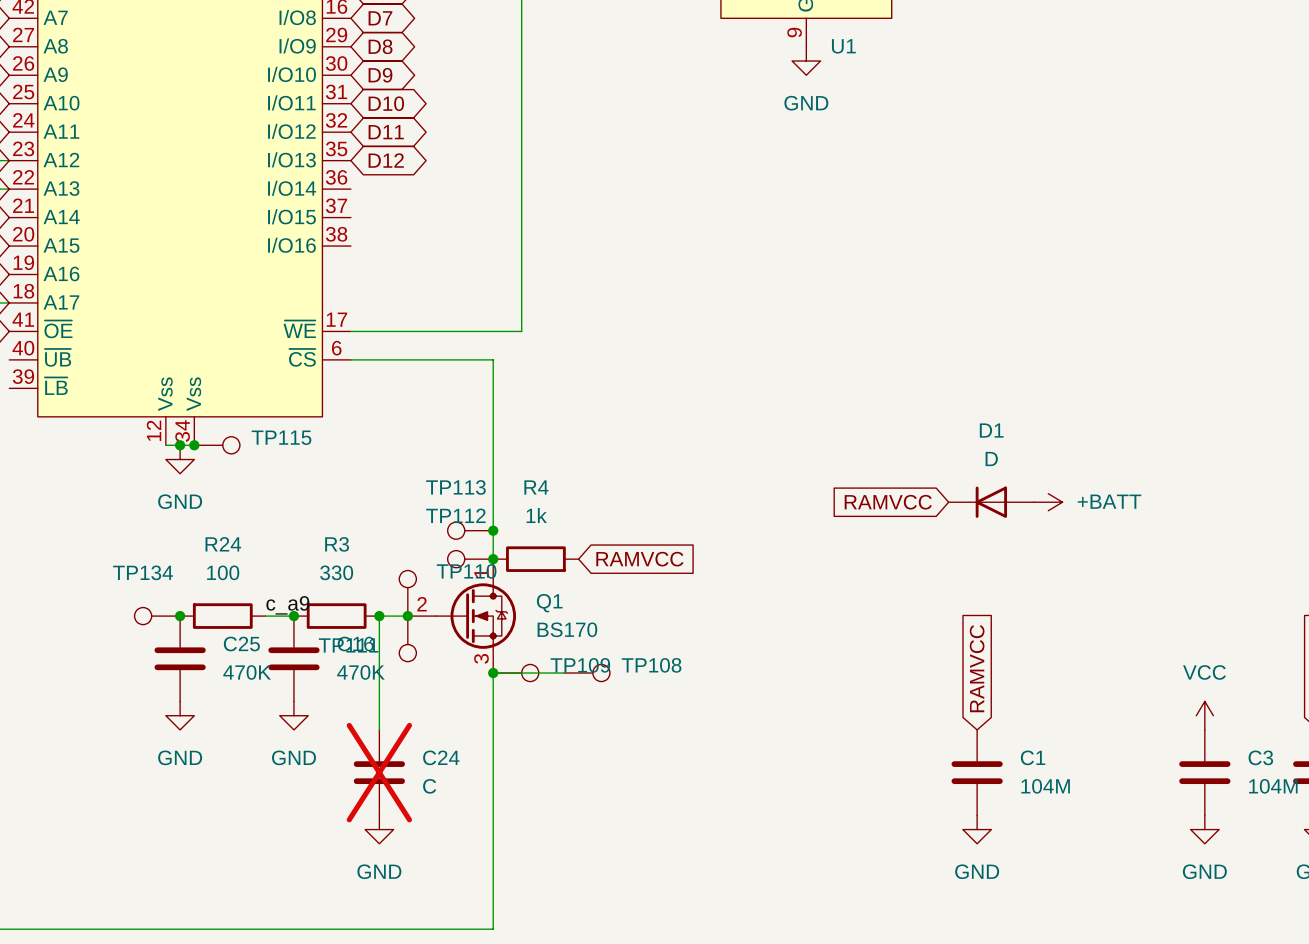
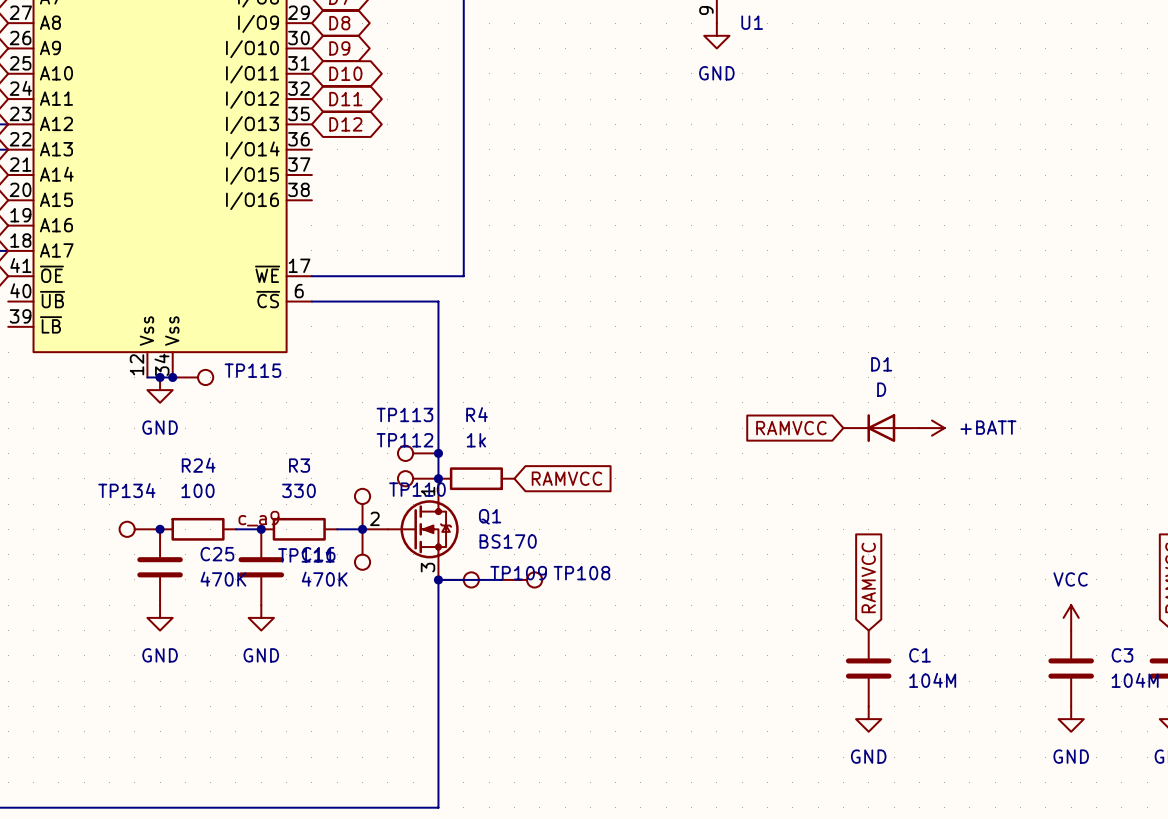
wire: (379, 616) (379, 729) -> none
junction: (379, 616) -> none
C24: C (379, 772) -> none
power symbol: GND (379, 829) -> none

